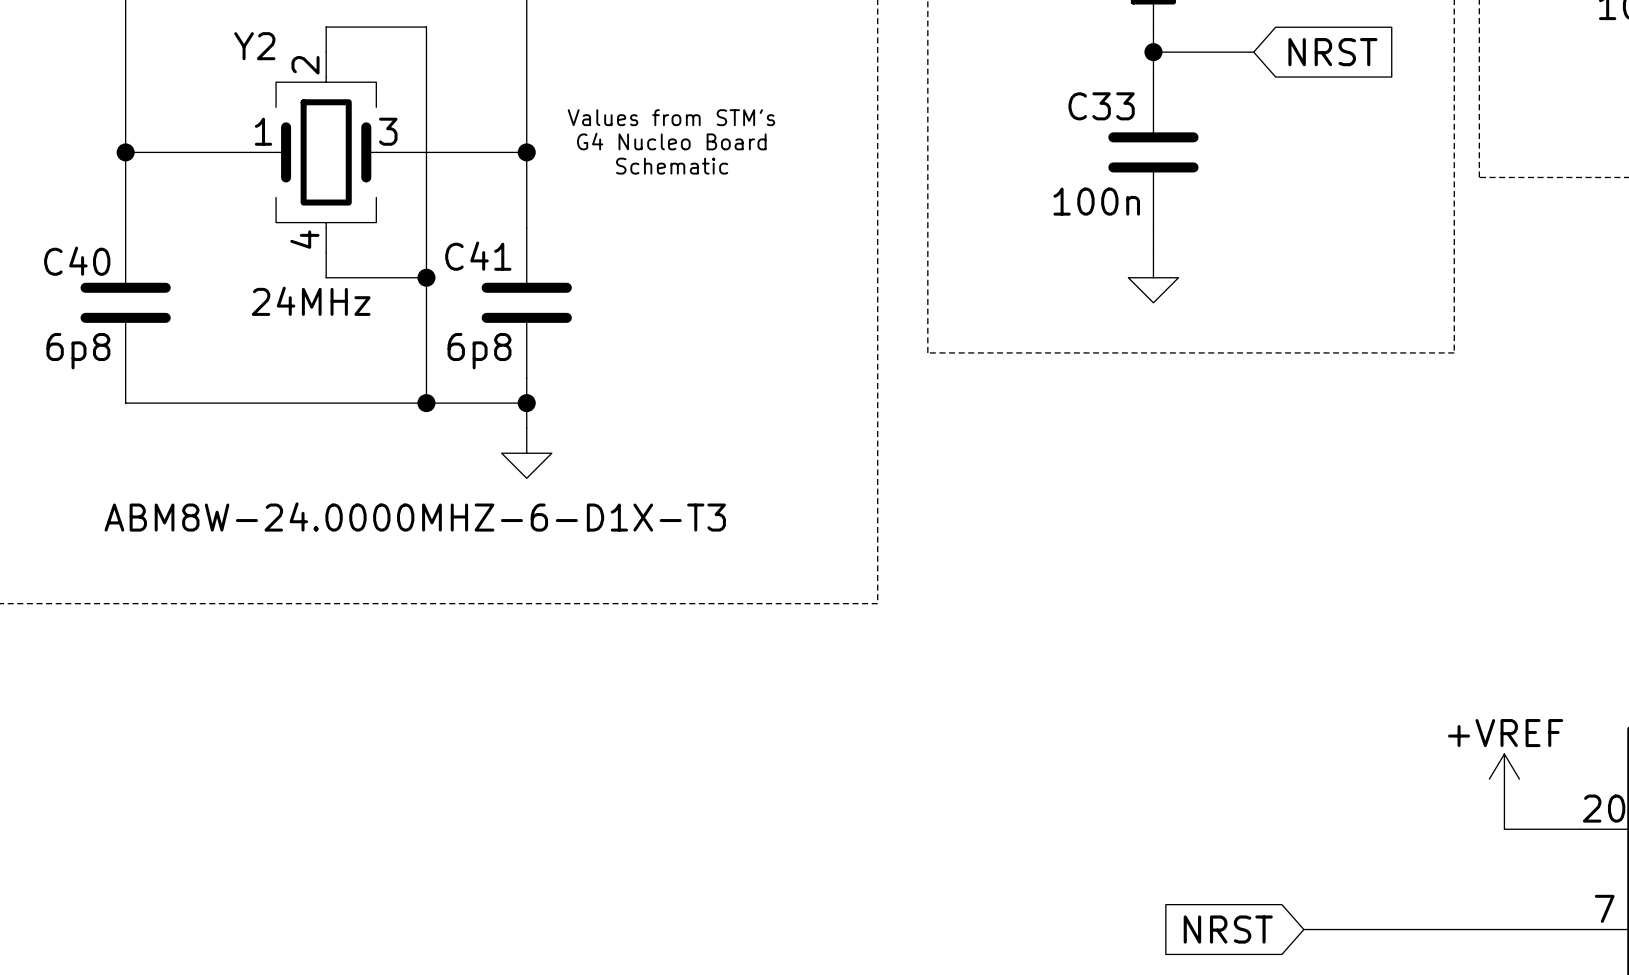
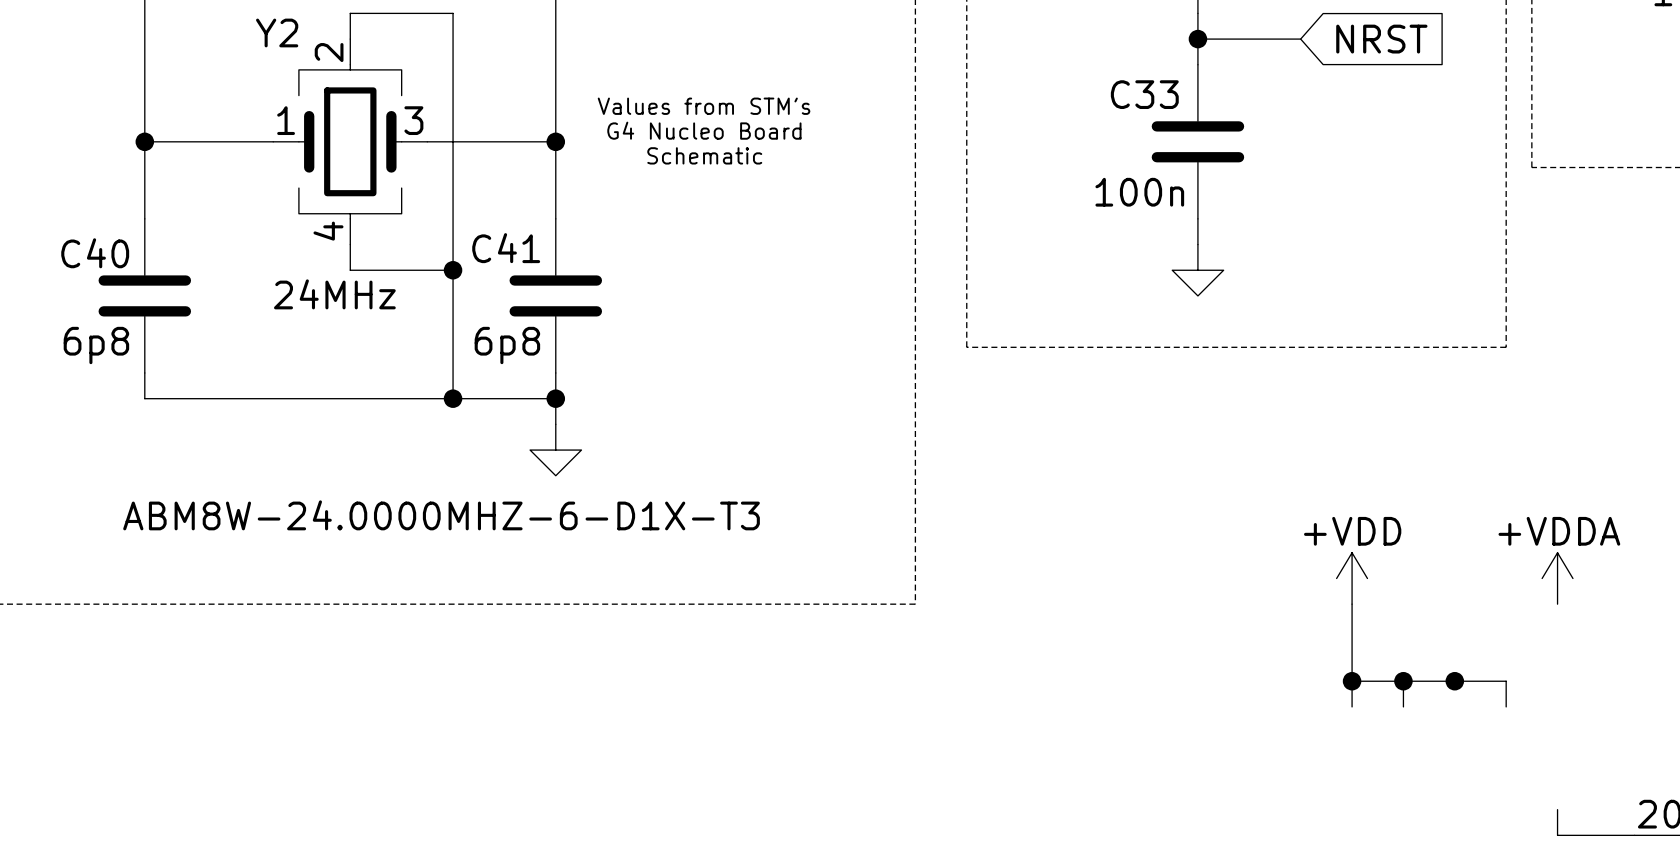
power symbol: none -> +VDD (1352, 578)
power symbol: none -> +VDDA (1557, 578)
wire: none -> (1352, 604) (1352, 706)
wire: none -> (1352, 681) (1506, 681) (1506, 706)
junction: none -> (1352, 681)
wire: none -> (1403, 681) (1403, 706)
junction: none -> (1403, 681)
junction: none -> (1454, 681)
power symbol: +VREF (1504, 779) -> none

